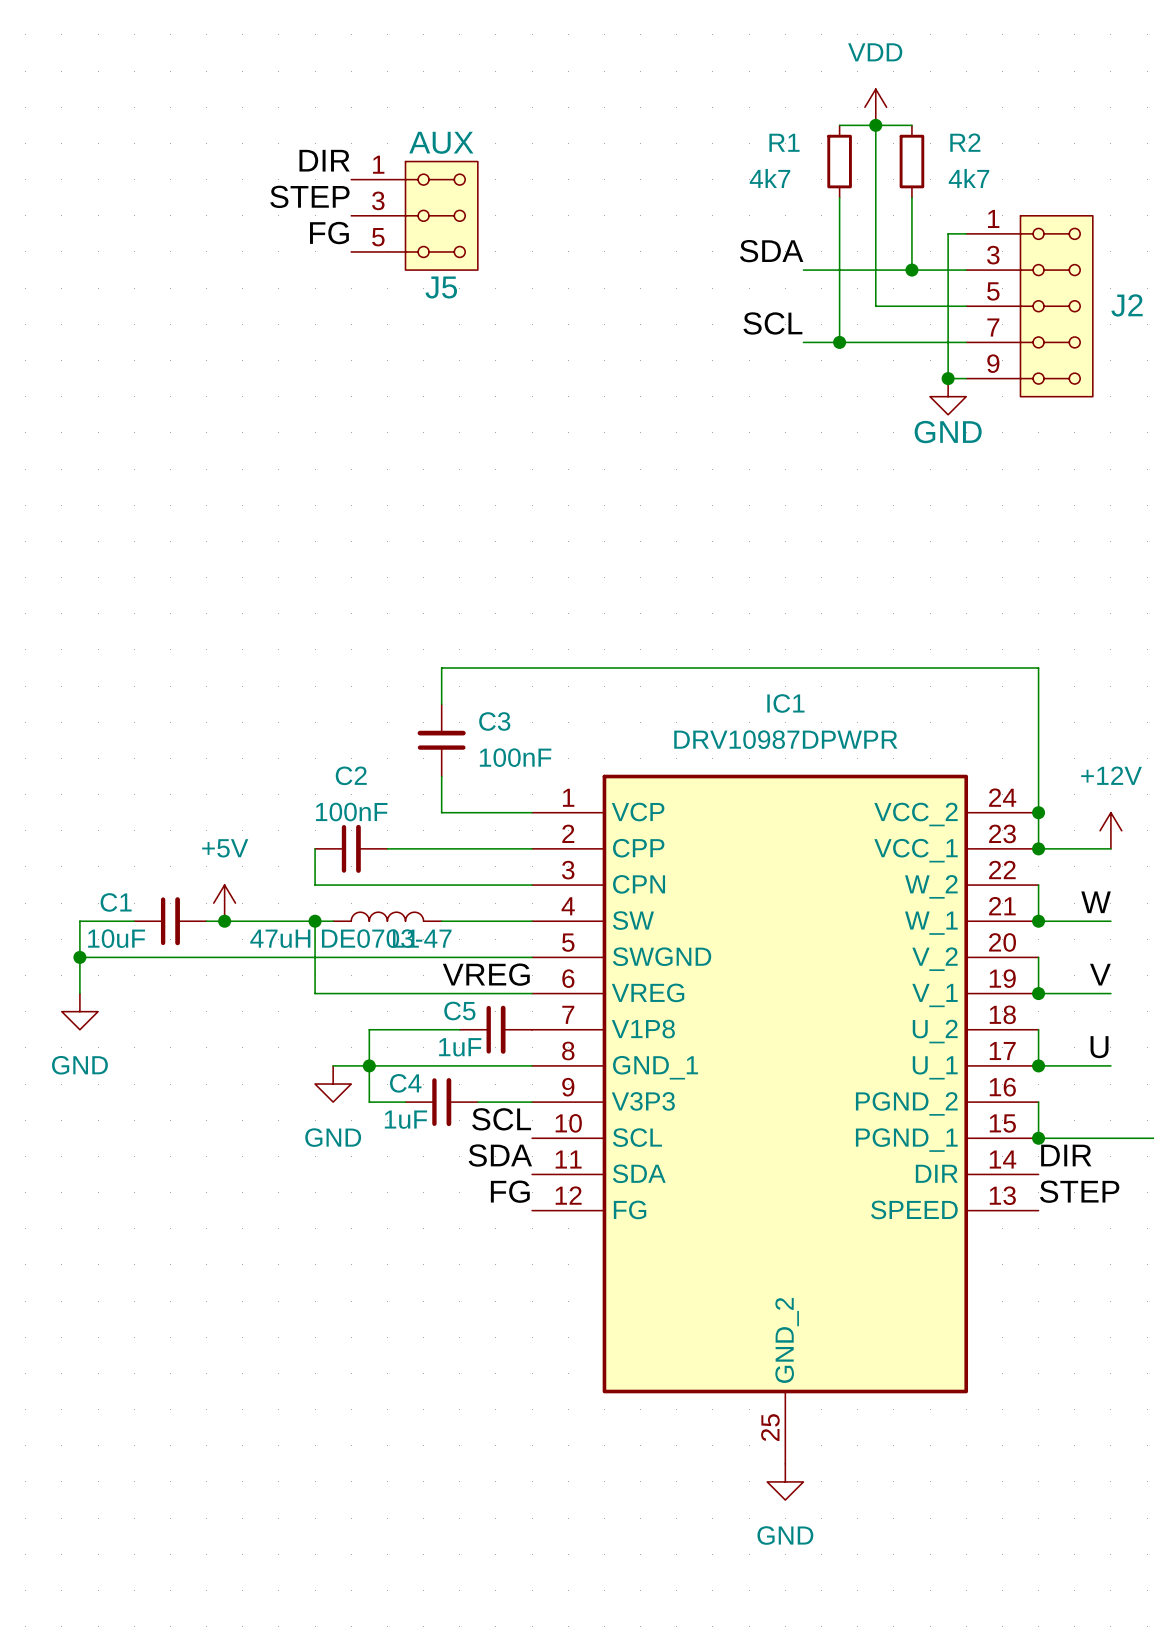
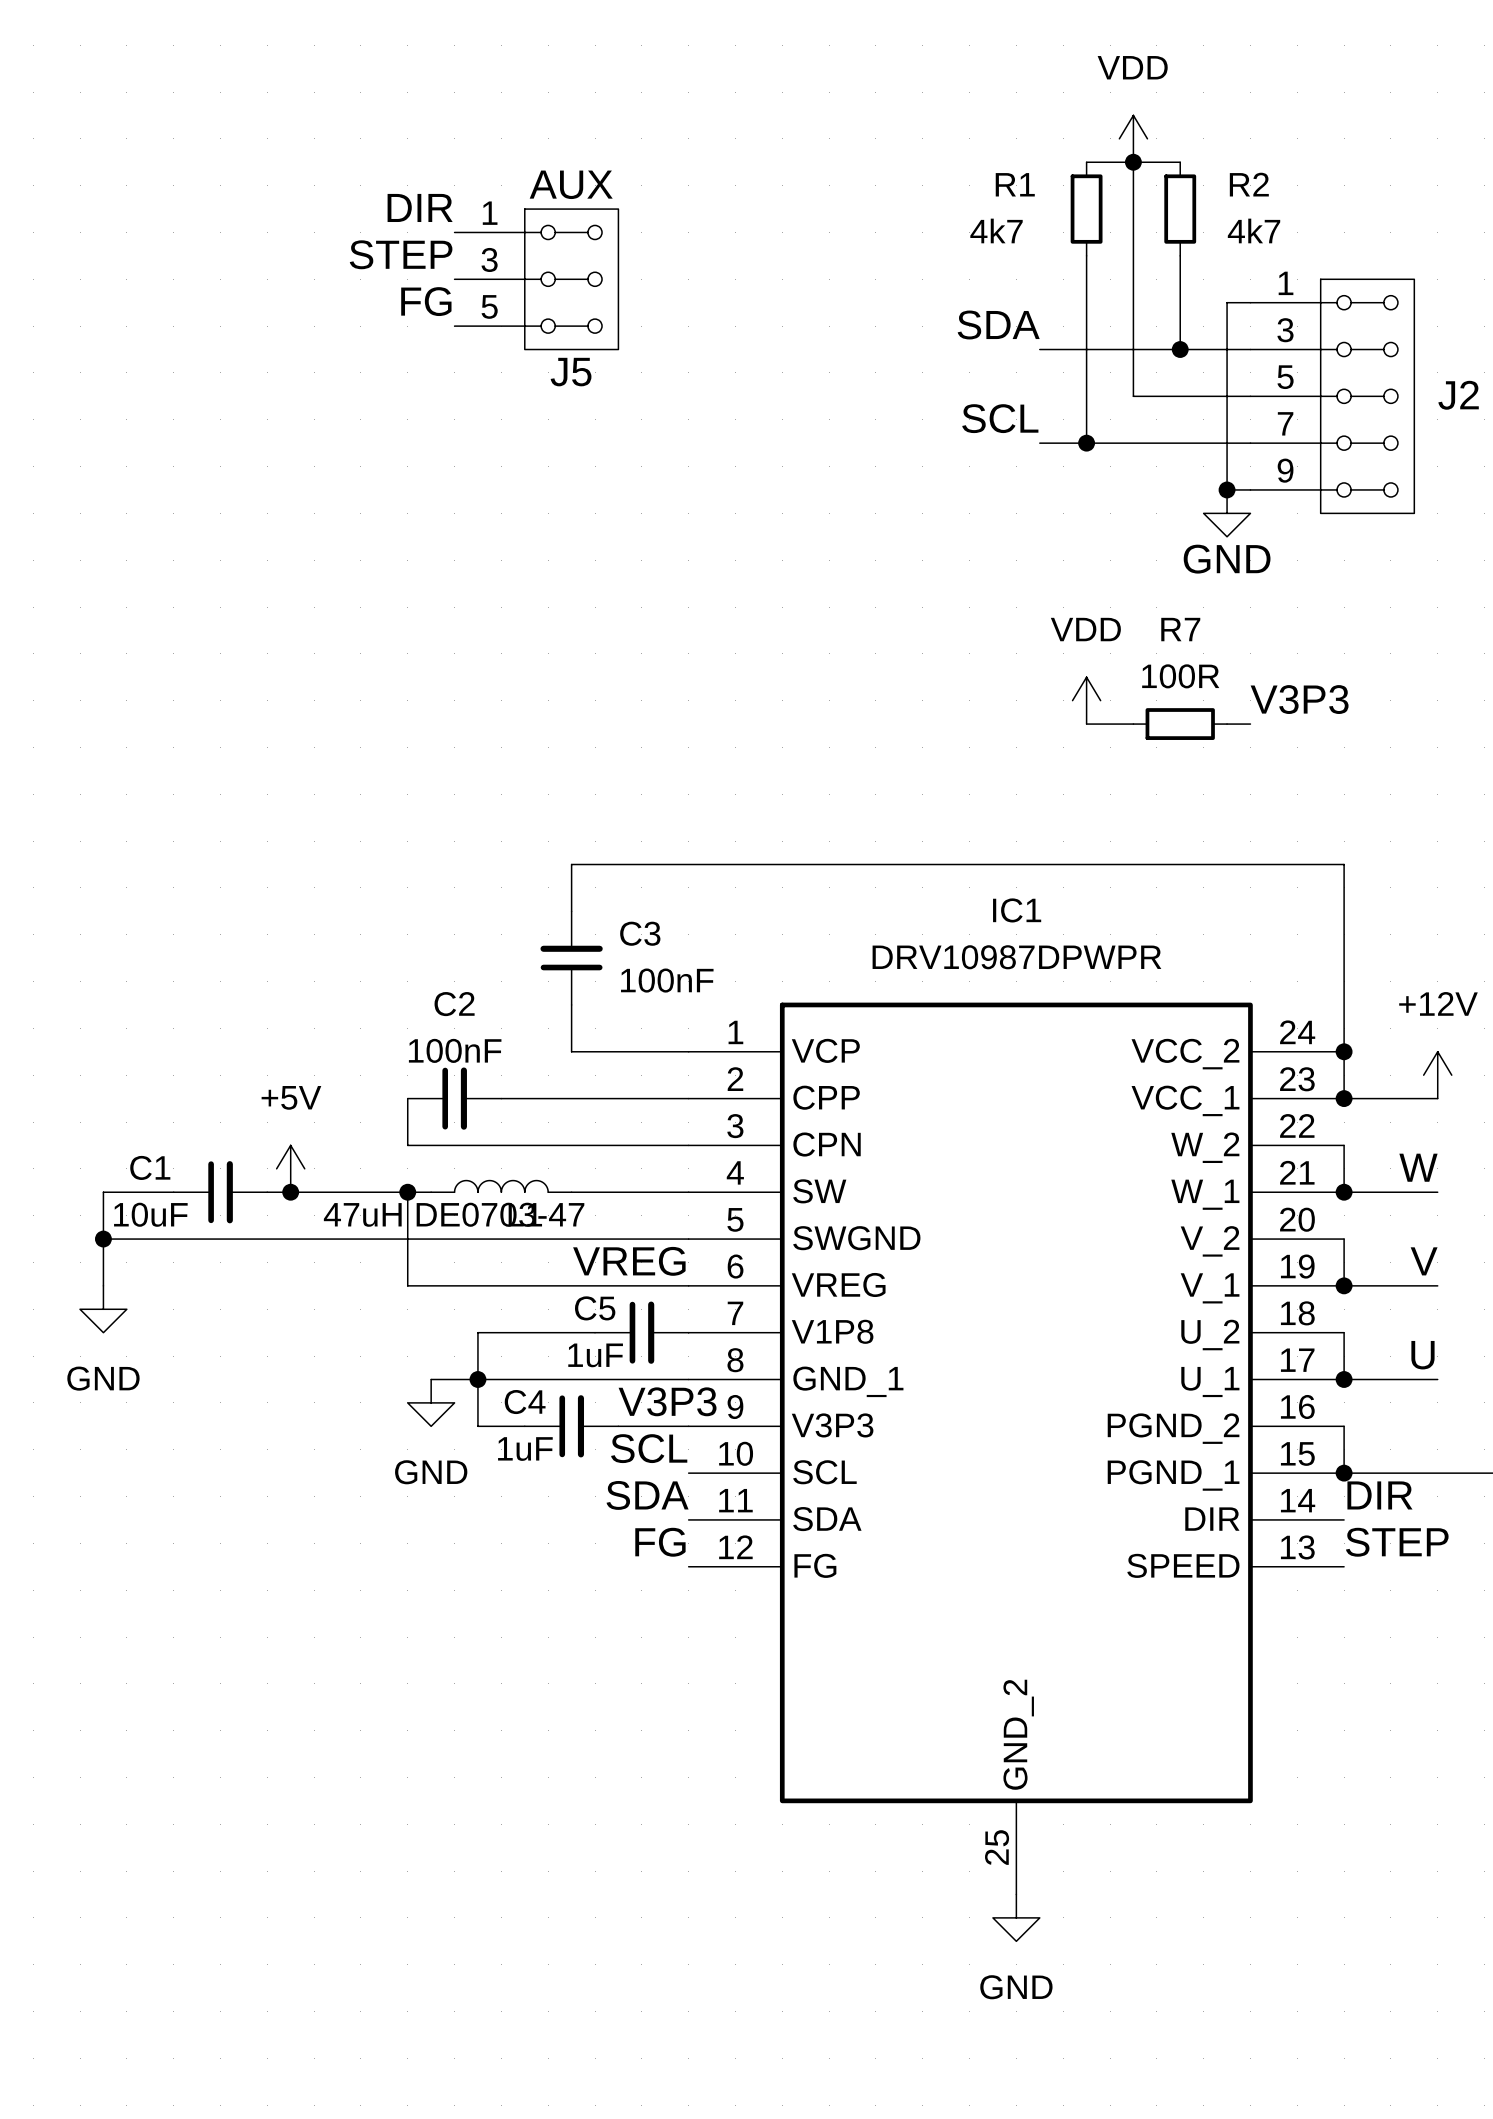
label: none -> V3P3 (1299, 699)
power symbol: none -> VDD (1086, 700)
wire: none -> (1086, 724) (1133, 724)
R7: none -> 100R (1180, 724)
wire: none -> (1227, 724) (1250, 724)
label: none -> V3P3 (667, 1401)

